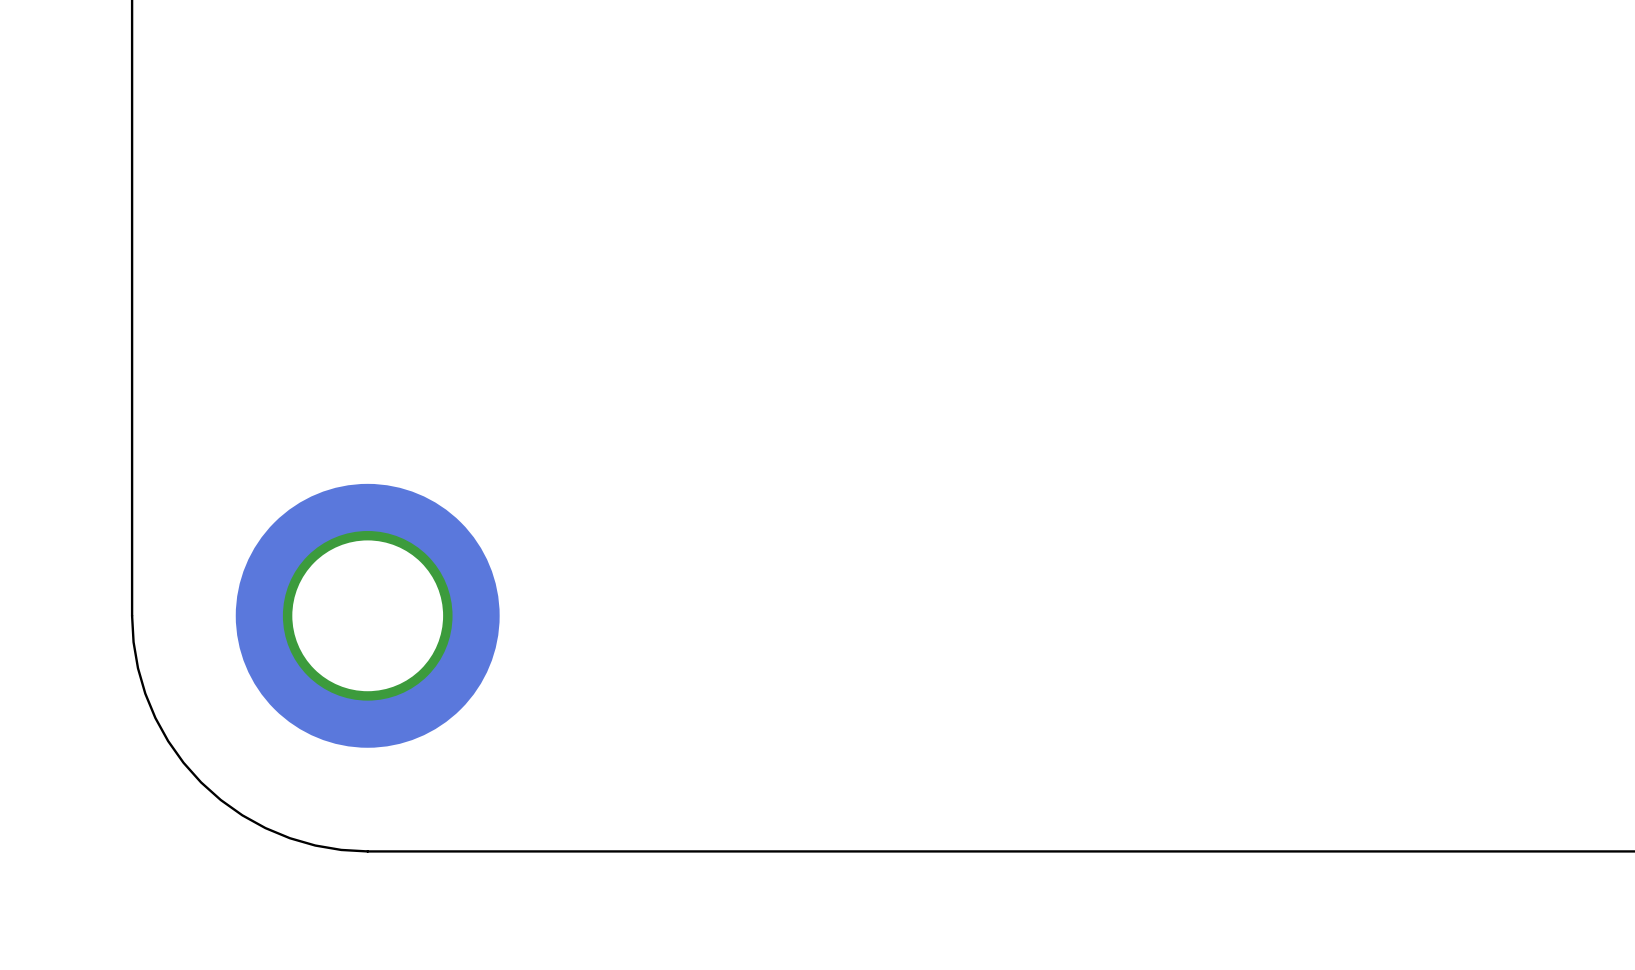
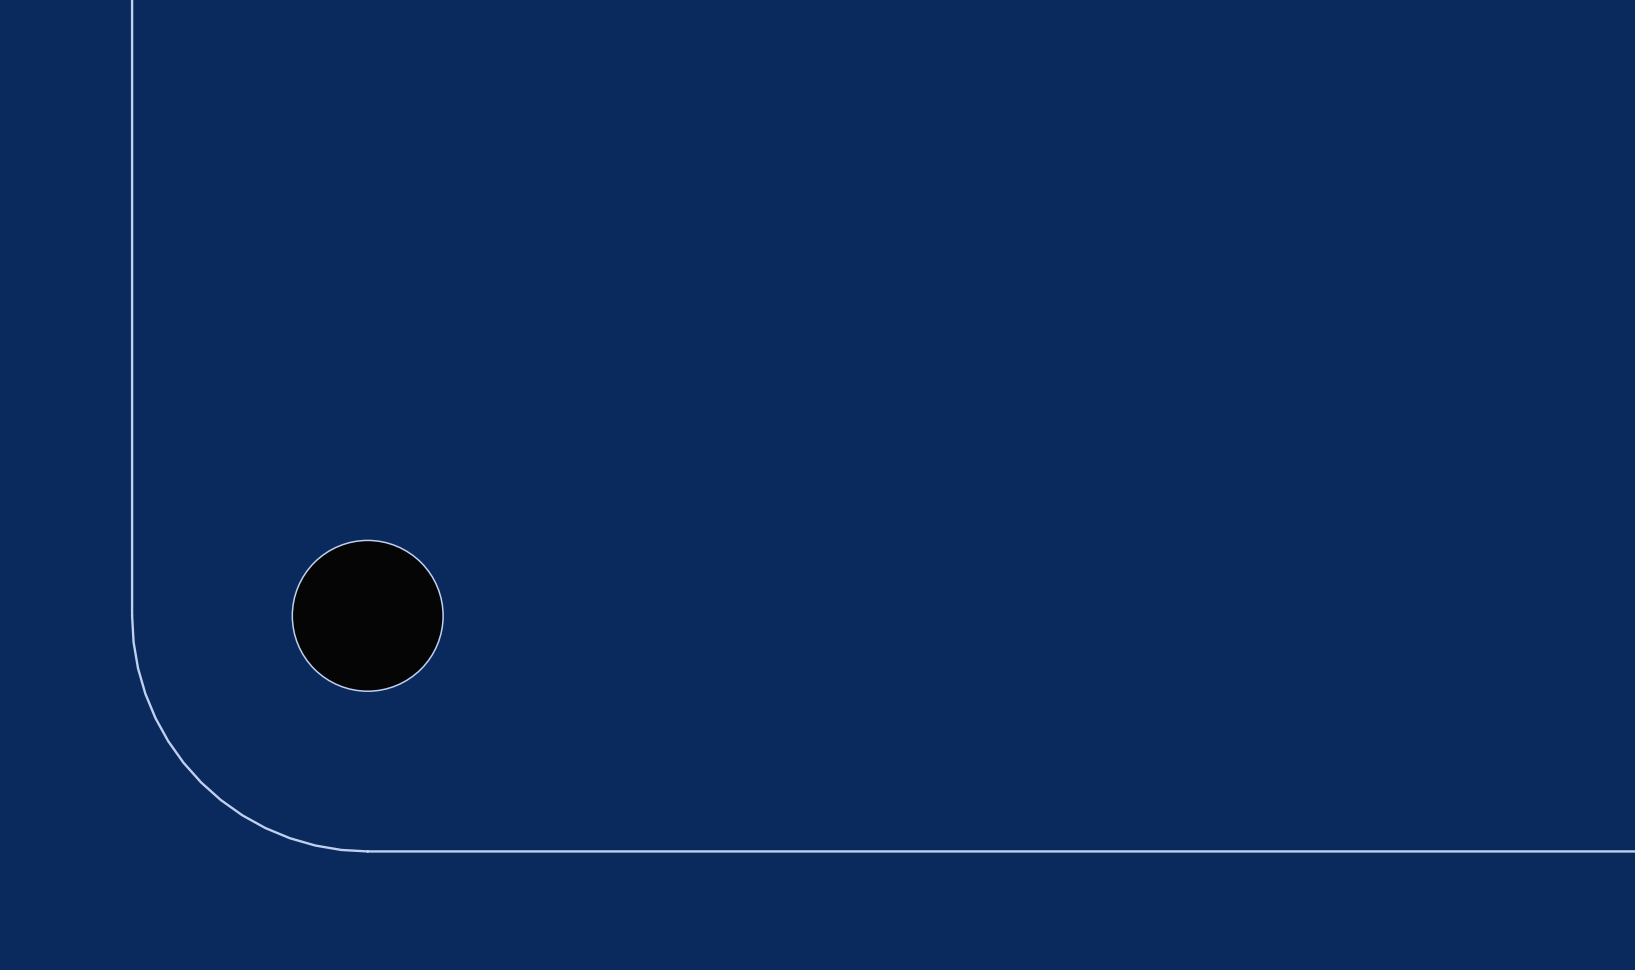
part footprint: [235, 483, 500, 748] -> [292, 540, 444, 692]

